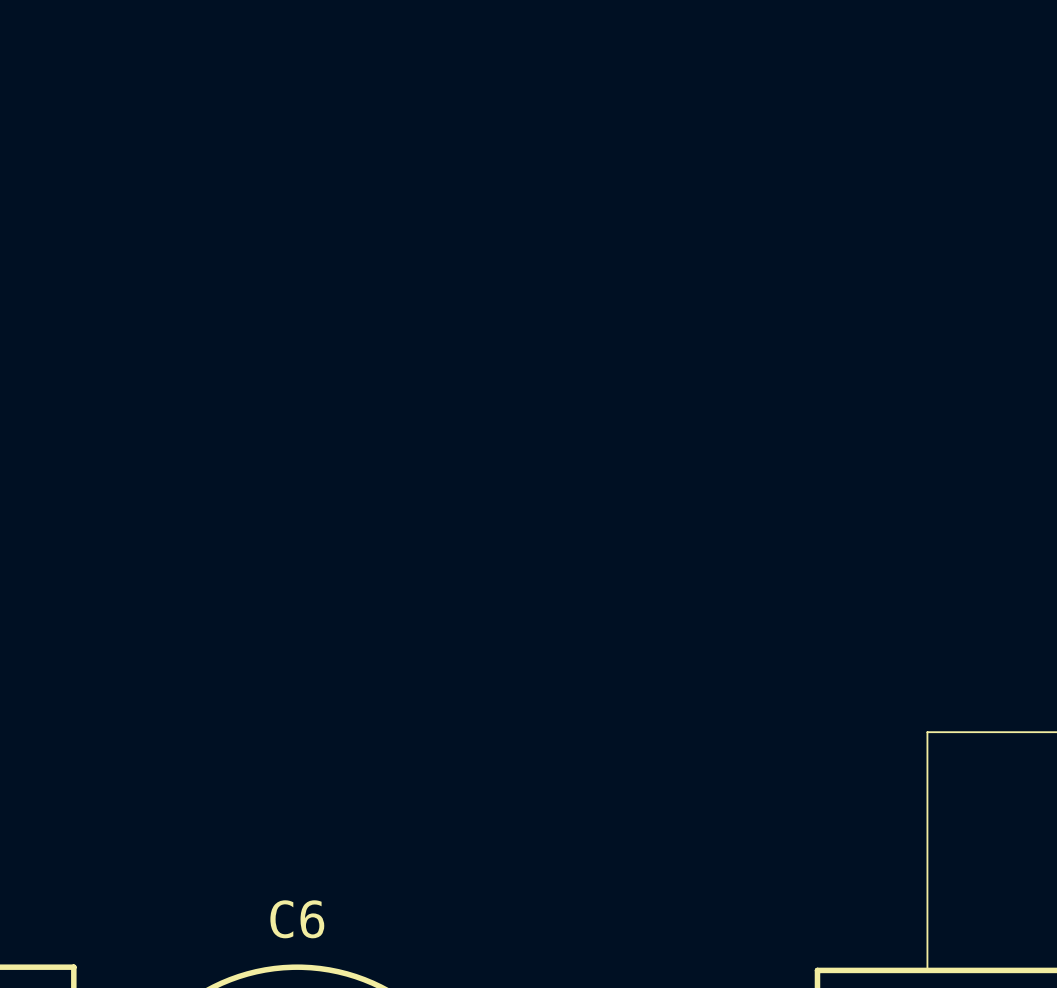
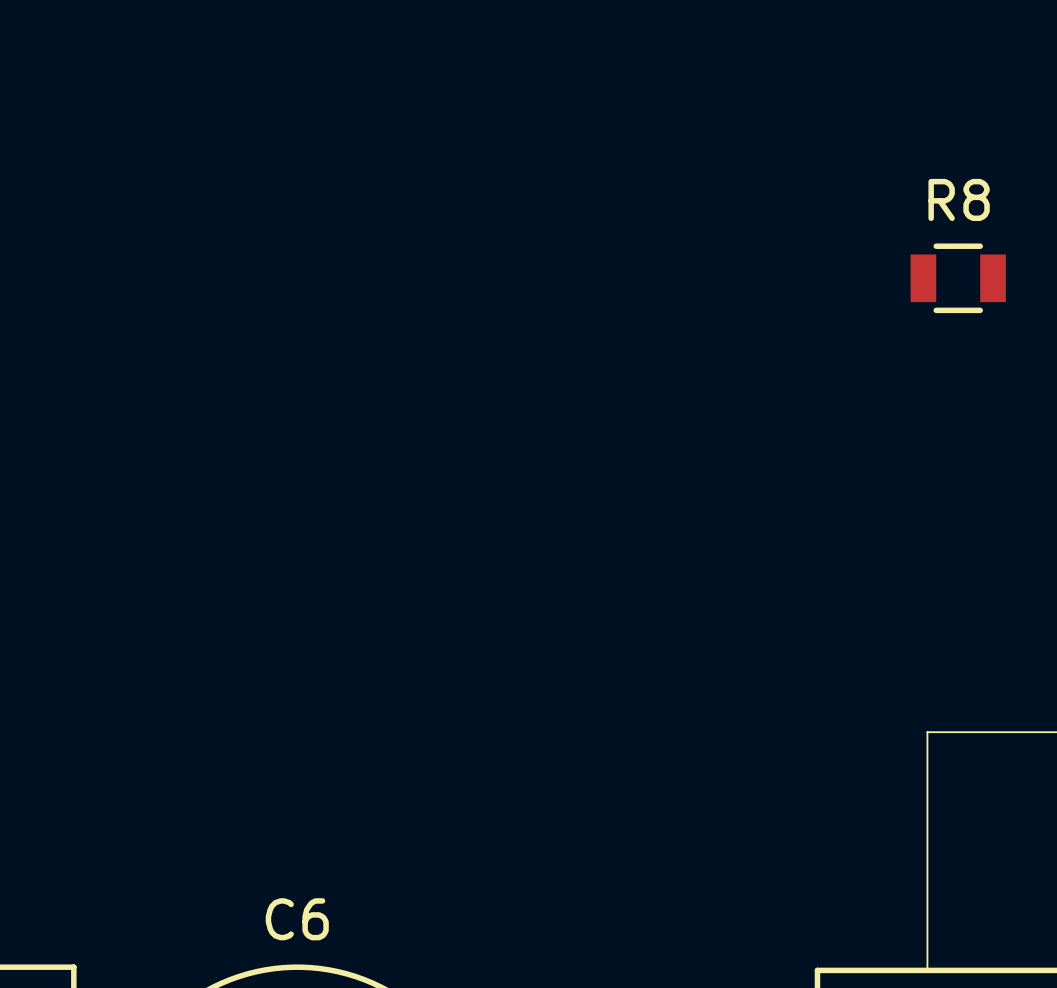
R8: none -> (958, 278)

